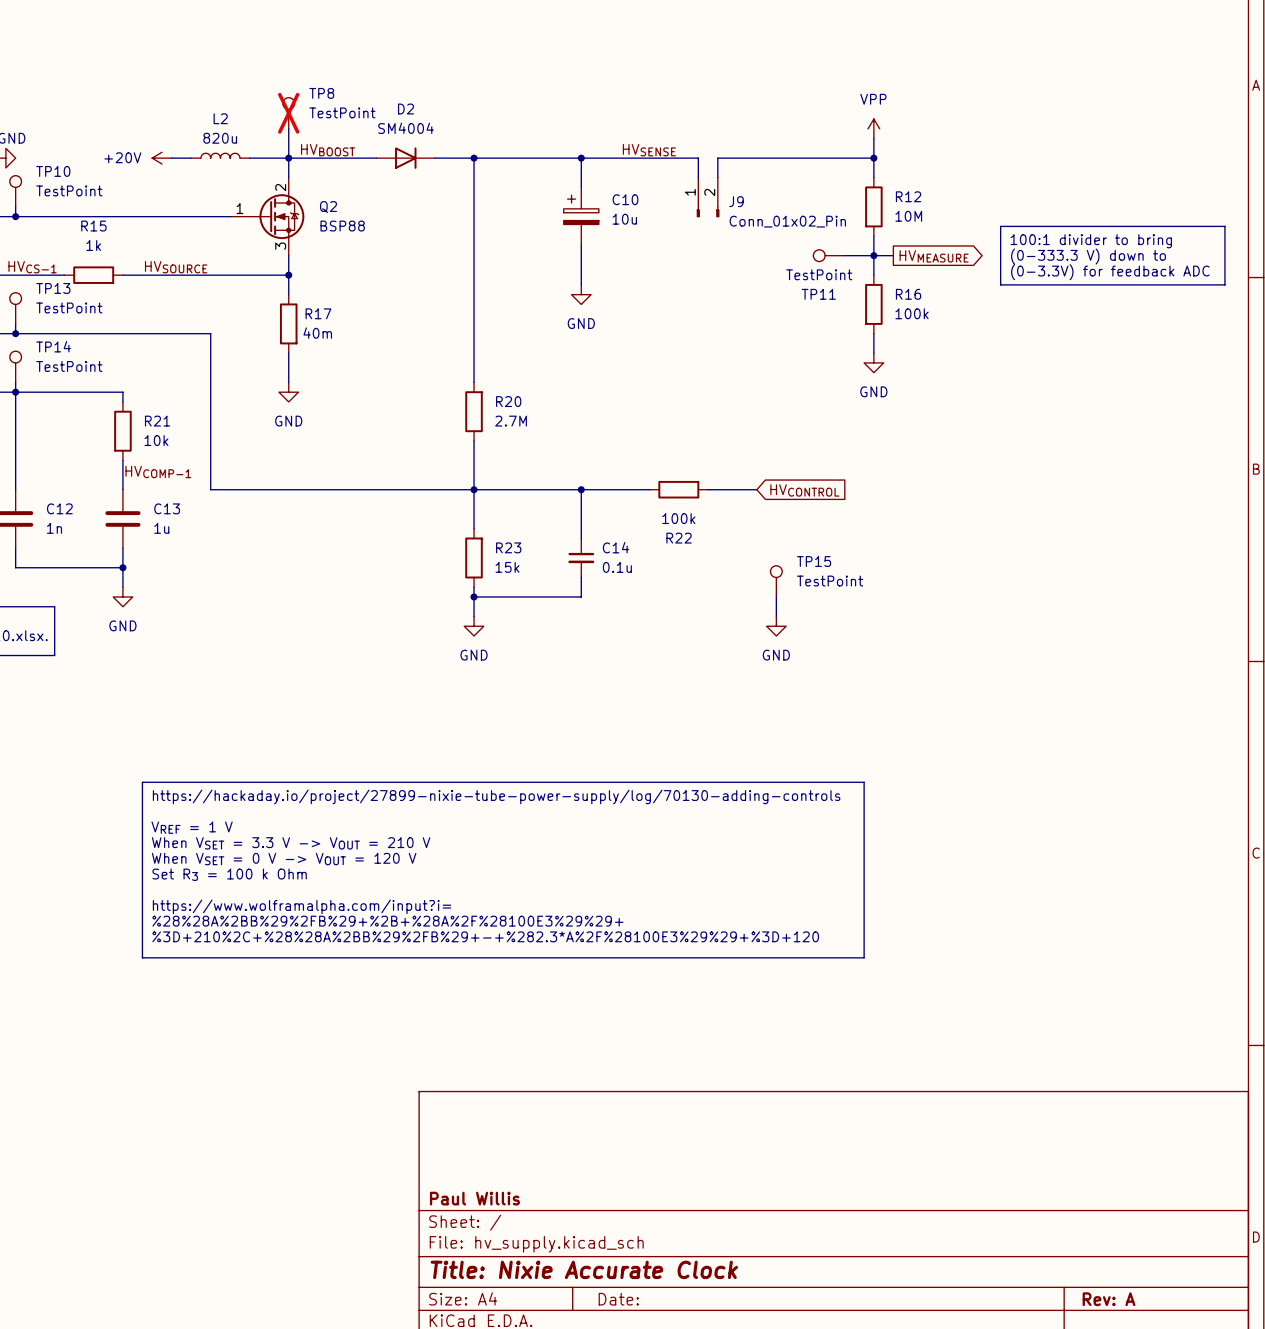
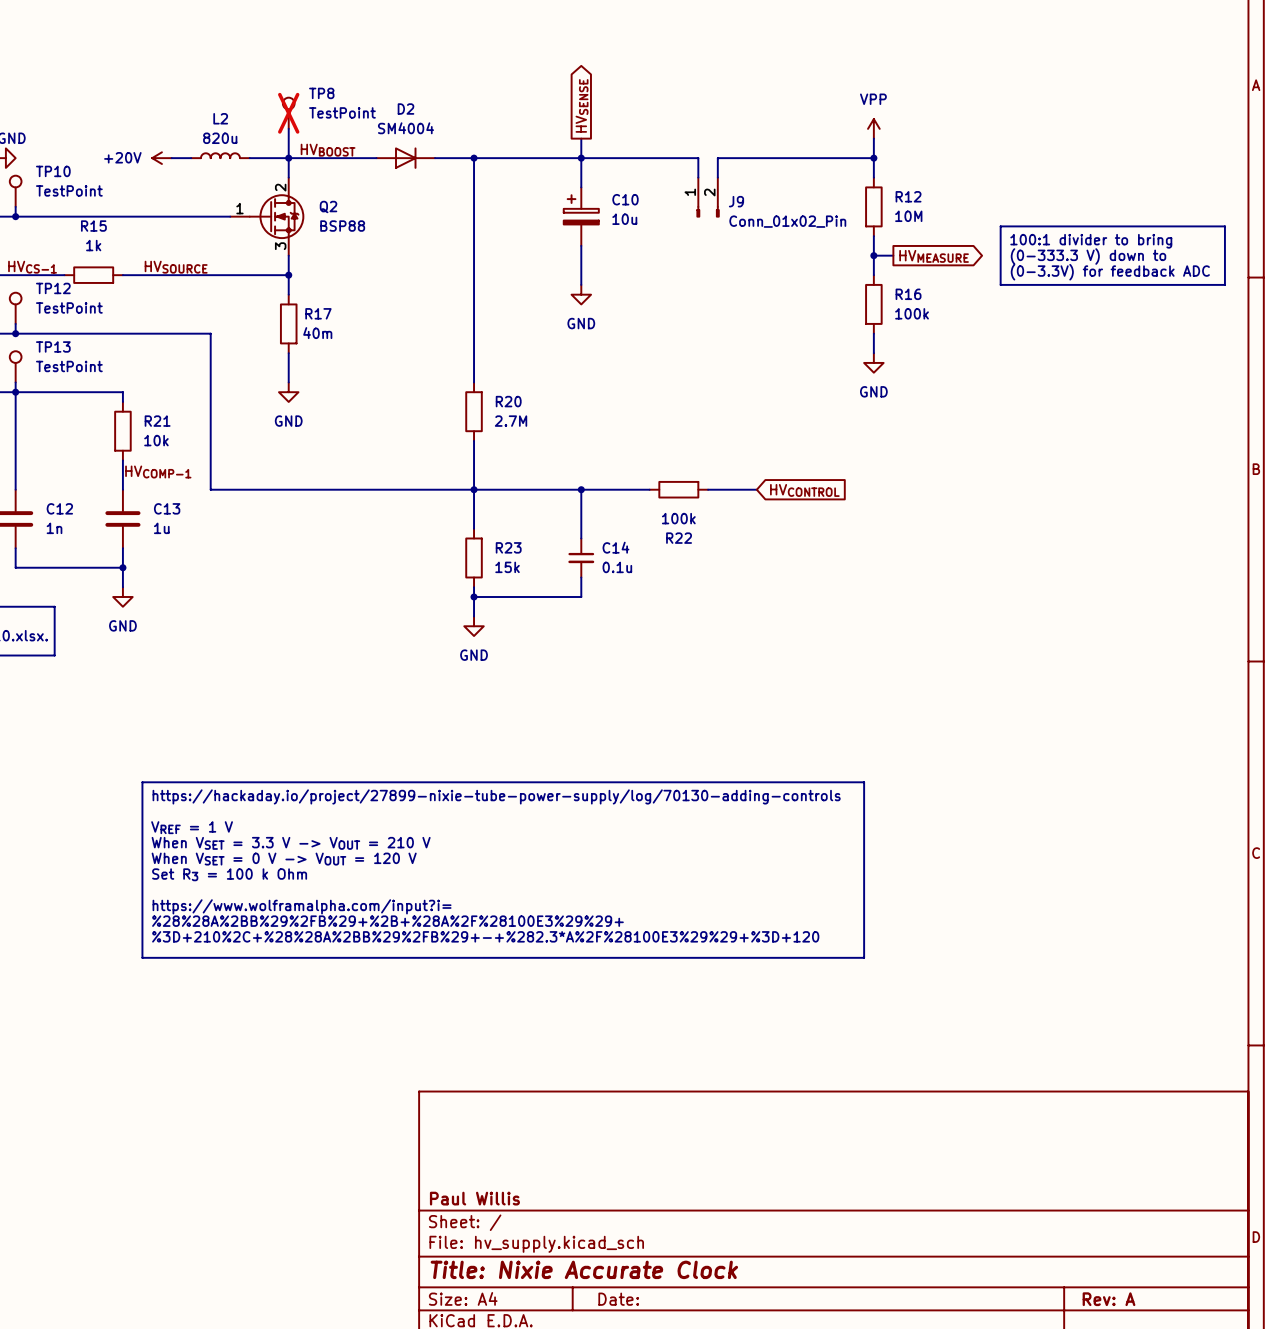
global label: none -> HVSENSE (582, 105)
wire: none -> (581, 138) (581, 158)
label: HVSENSE (649, 150) -> none
TP11: TestPoint (829, 255) -> none
wire: (844, 255) (873, 255) -> none
TP13 name: TP13 (53, 288) -> TP12 (53, 288)
TP14 name: TP14 (53, 346) -> TP13 (53, 346)
TP15: TestPoint (776, 581) -> none
wire: (776, 596) (776, 616) -> none
power symbol: GND (776, 626) -> none

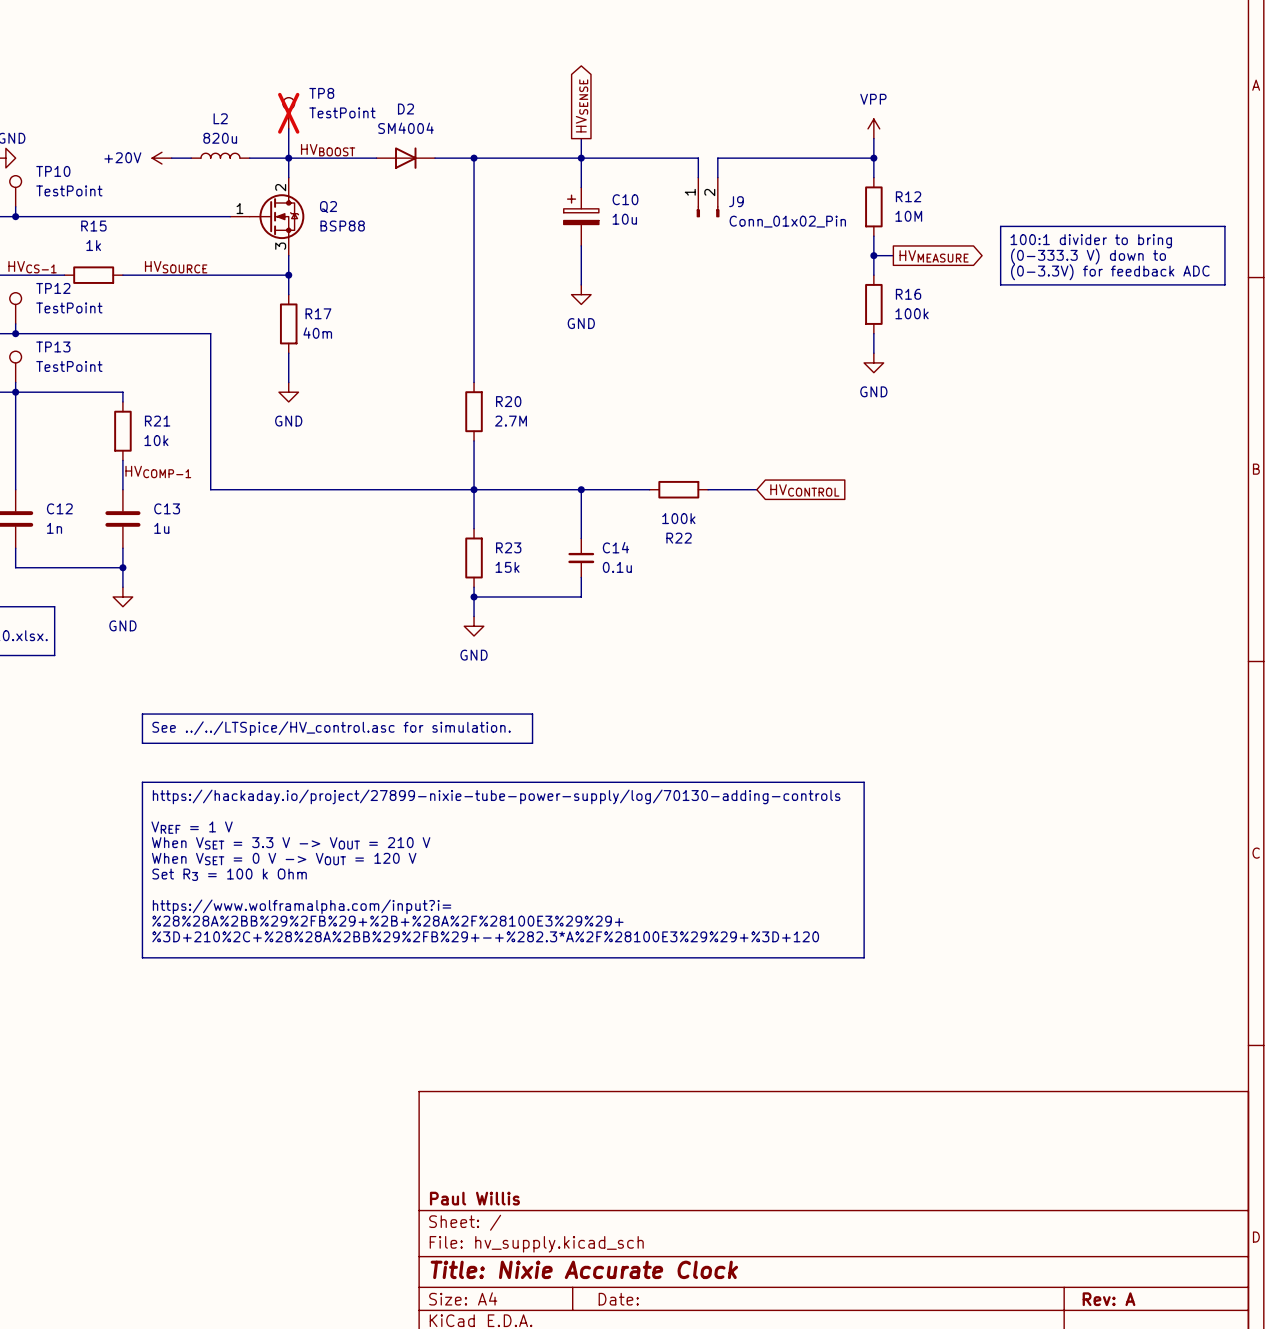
line: none -> (142, 714) (532, 714) (532, 743) (142, 743) (142, 714)
text: none -> See ../../LTSpice/HV_control.asc for simulation. (331, 728)

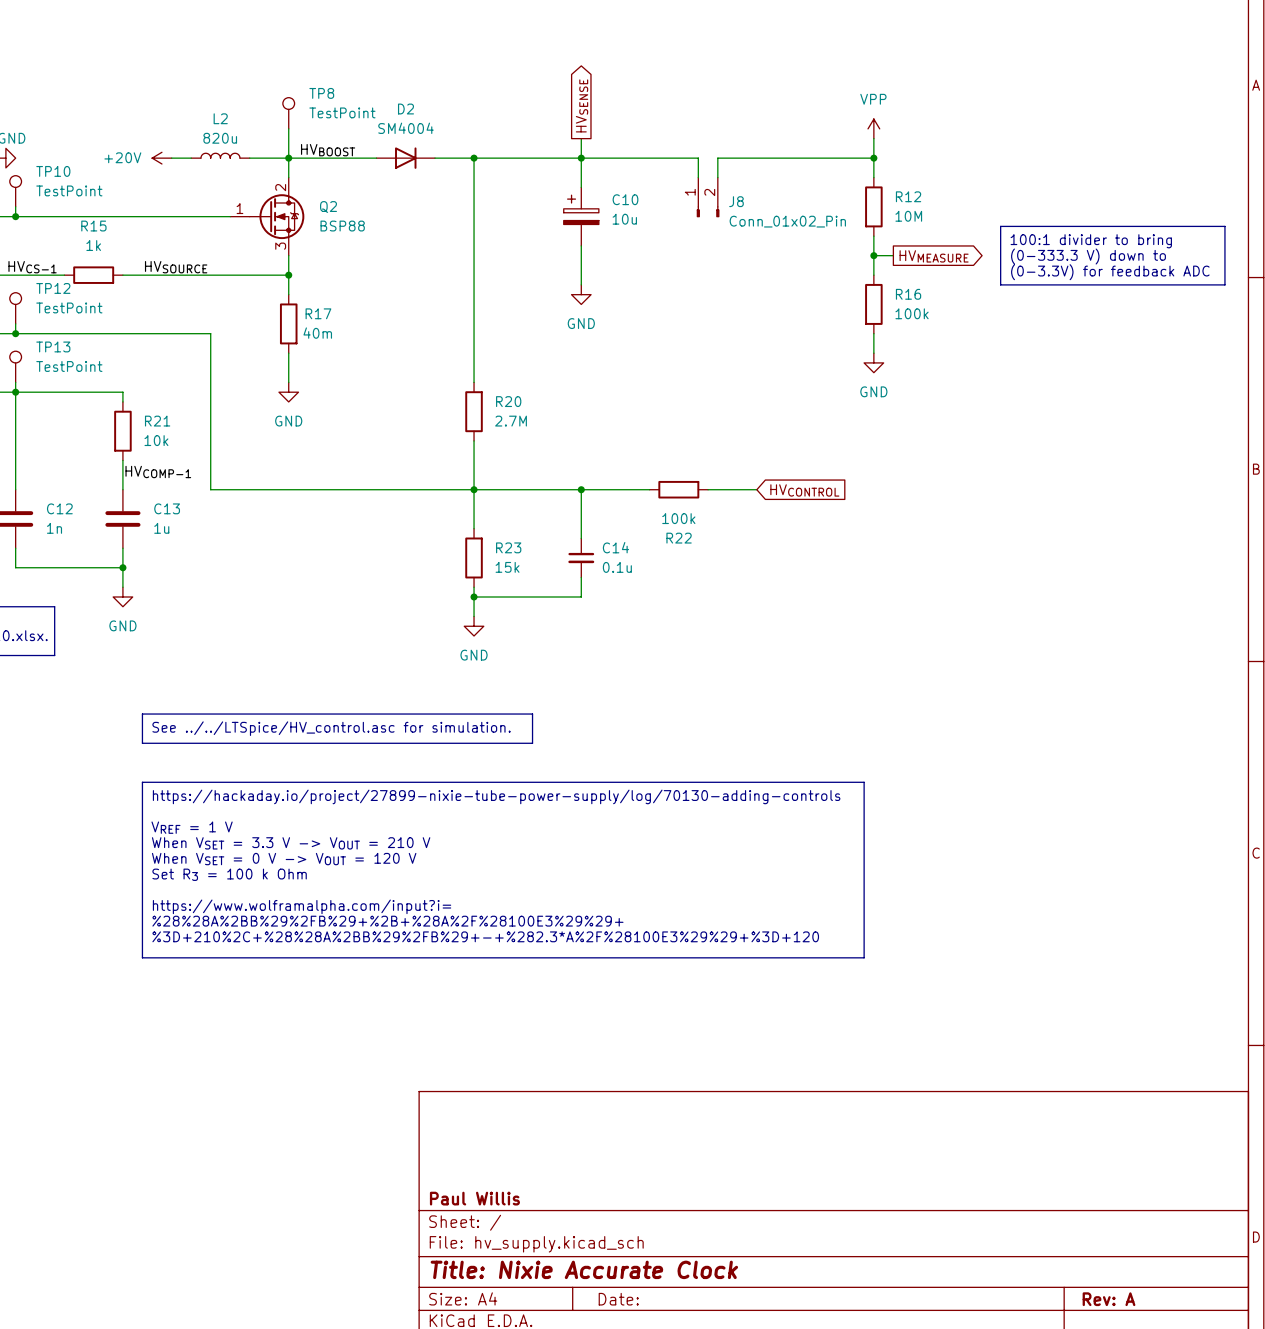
TP8 do-not-place cross: (288, 113) -> none
J9 name: J9 (736, 201) -> J8 (736, 201)

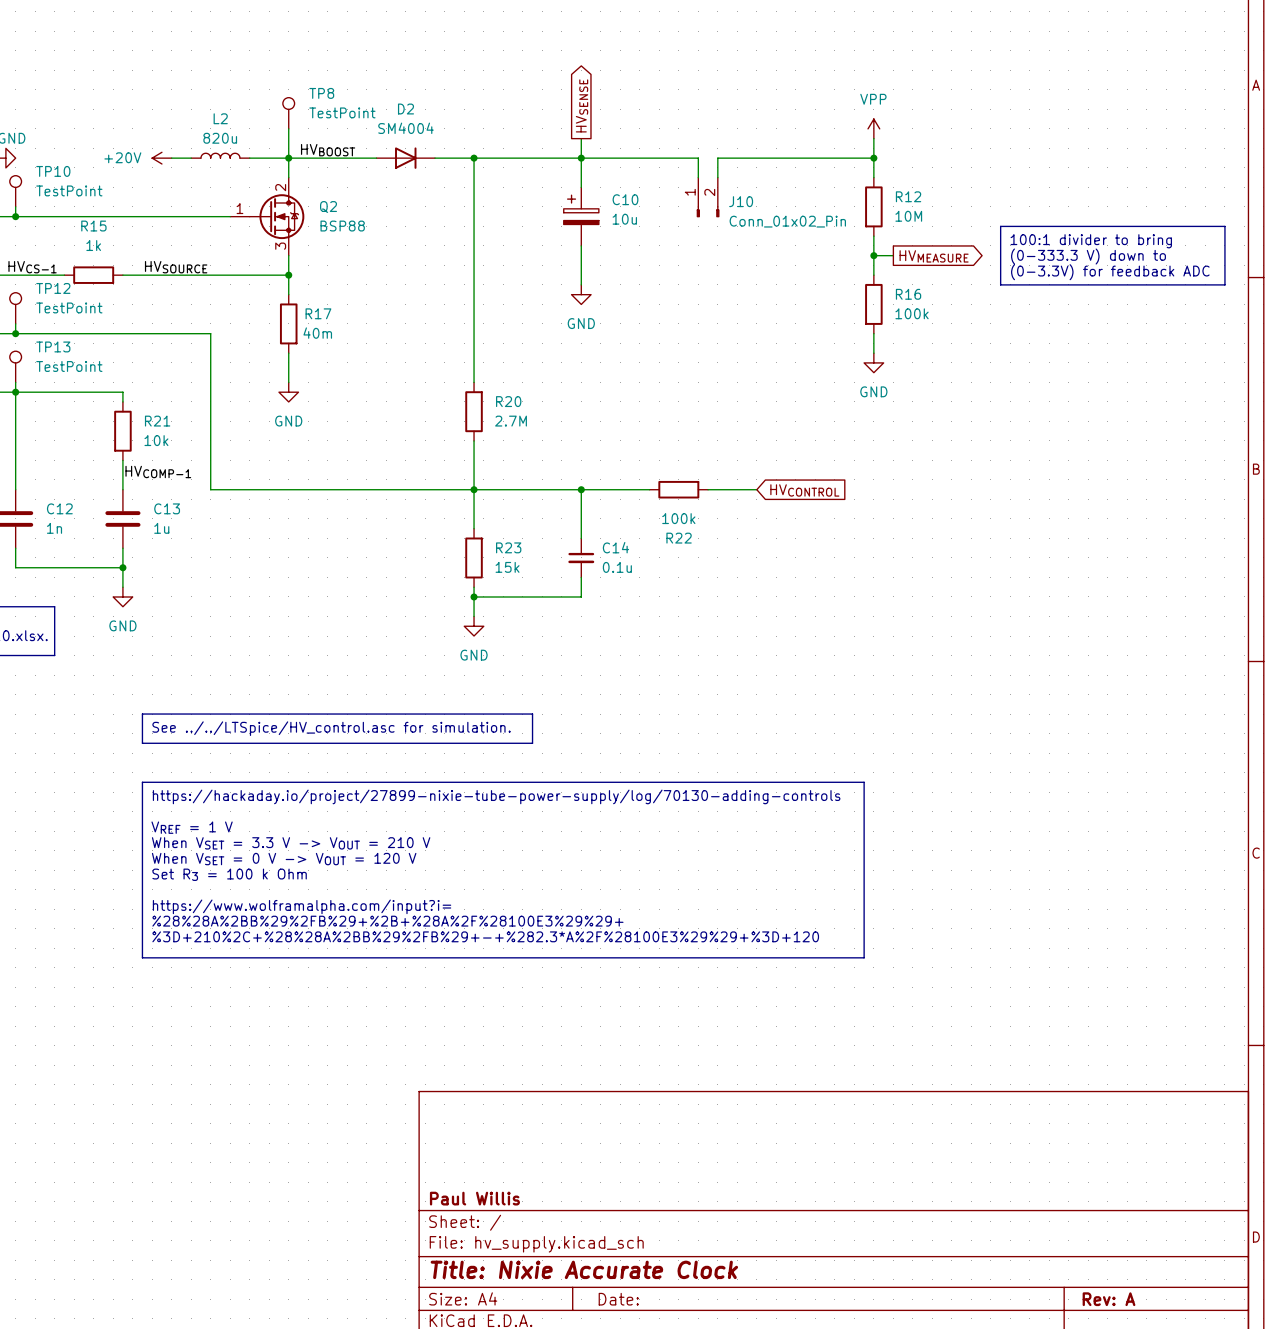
J8 name: J8 (736, 201) -> J10 (741, 201)

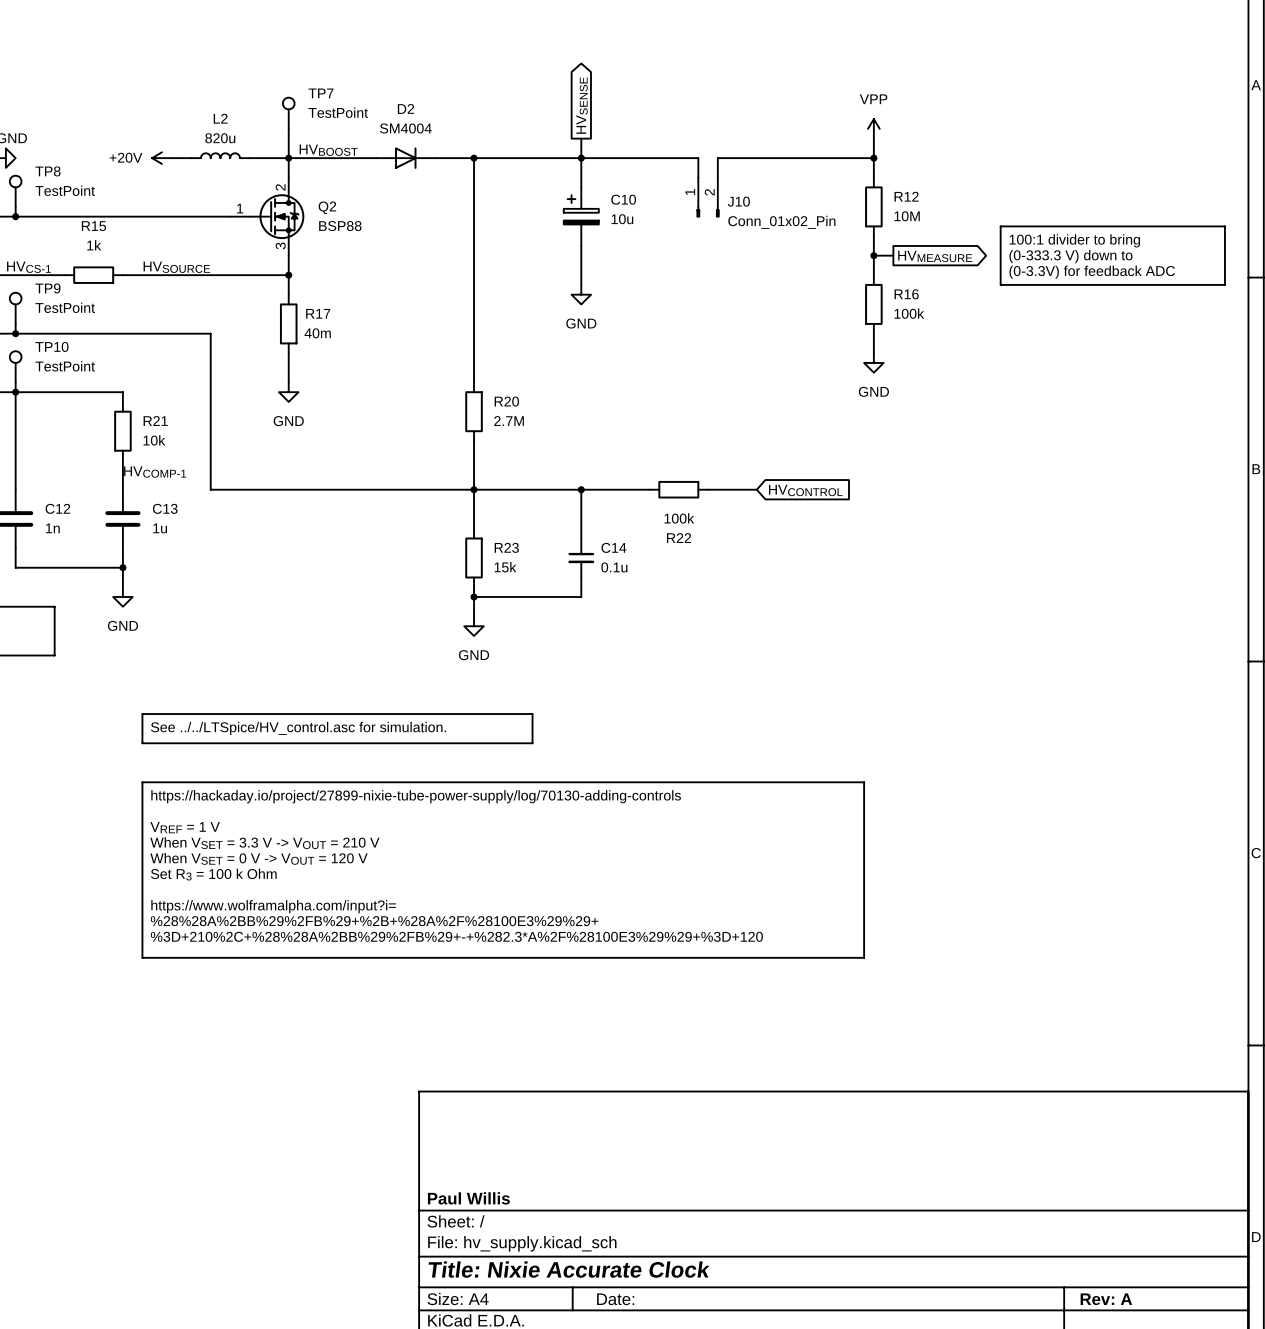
TP8 name: TP8 (321, 93) -> TP7 (321, 93)
TP10 name: TP10 (53, 171) -> TP8 (48, 171)
TP12 name: TP12 (53, 288) -> TP9 (47, 288)
TP13 name: TP13 (53, 346) -> TP10 (51, 346)

